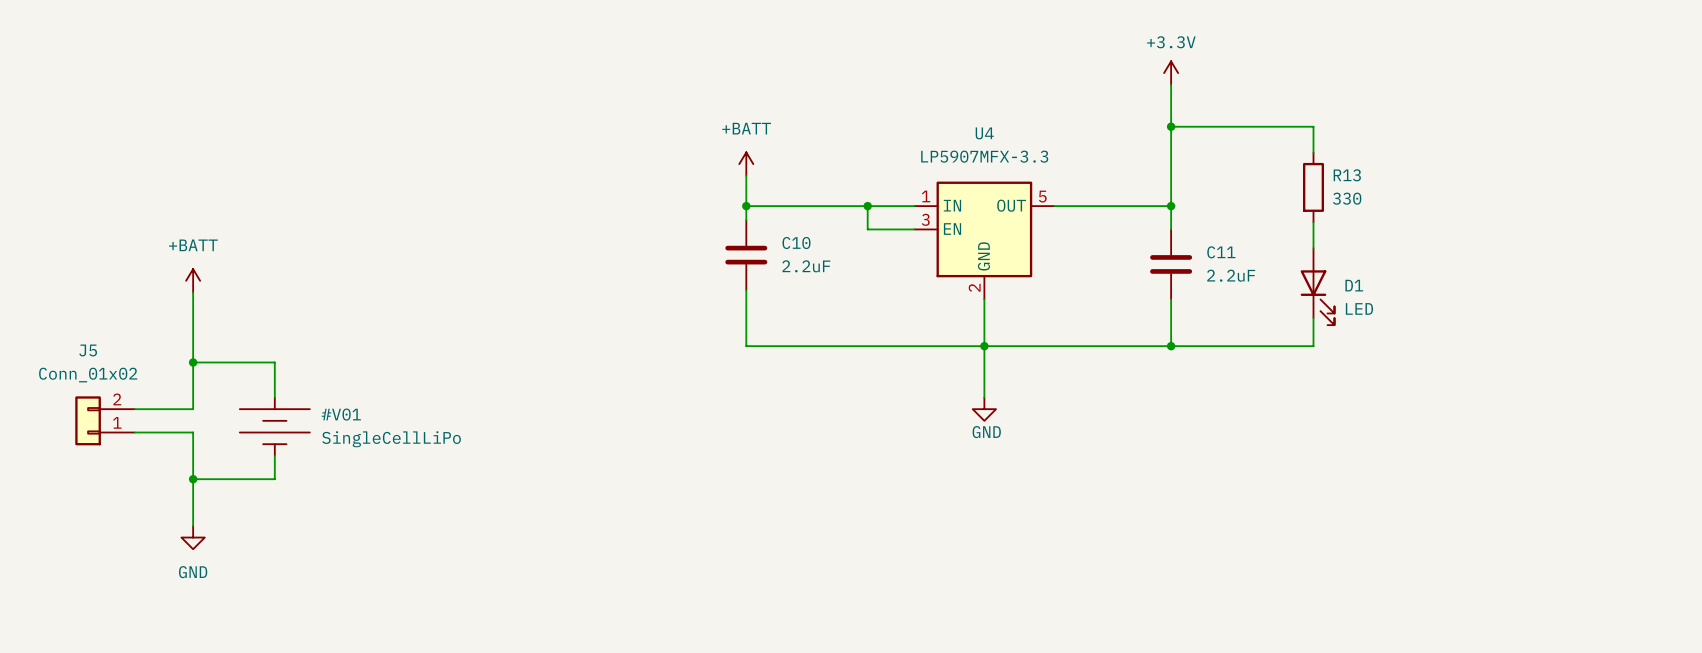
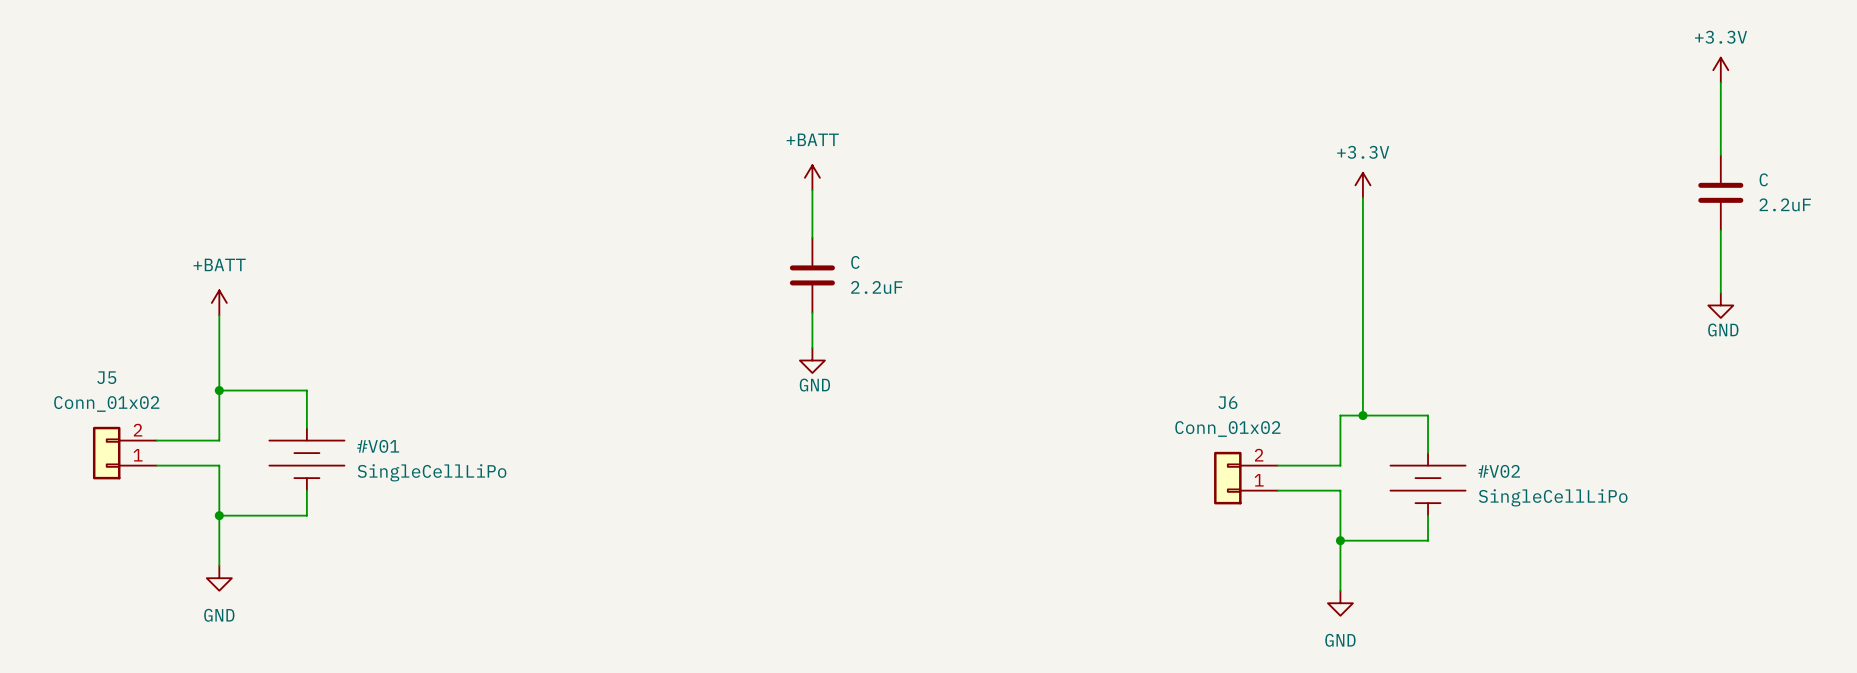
power symbol: none -> +3.3V (1720, 70)
power symbol position: +3.3V (1171, 73) -> +3.3V (1362, 185)
wire: none -> (1720, 82) (1720, 155)
wire: (1171, 84) (1171, 229) -> none
wire: (1171, 126) (1313, 126) (1313, 152) -> none
junction: (1171, 126) -> none
C: none -> 2.2uF (1720, 192)
wire: none -> (1362, 197) (1362, 415)
R13: 330 (1313, 187) -> none
wire: (746, 206) (914, 206) -> none
junction: (746, 206) -> none
wire: (867, 206) (867, 229) (914, 229) -> none
junction: (867, 206) -> none
wire: (1054, 206) (1171, 206) -> none
junction: (1171, 206) -> none
wire: none -> (1720, 230) (1720, 292)
wire: (1313, 222) (1313, 248) -> none
U4: LP5907MFX-3.3 (984, 240) -> none
C10 name: C10 (796, 243) -> C (855, 262)
C11: 2.2uF (1171, 264) -> none
power symbol: none -> GND (1720, 305)
D1: LED (1317, 286) -> none
wire: (984, 299) (984, 397) -> none
wire: (1171, 299) (1171, 346) -> none
wire: (1313, 318) (1313, 346) (746, 346) (746, 322) -> none
power symbol: none -> GND (812, 360)
junction: (984, 346) -> none
junction: (1171, 346) -> none
junction: none -> (1362, 415)
power symbol: GND (984, 409) -> none
wire: none -> (1428, 453) (1428, 415) (1340, 415) (1340, 465) (1277, 465)
J6: none -> Conn_01x02 (1245, 478)
#V02: none -> SingleCellLiPo (1428, 484)
wire: none -> (1277, 490) (1340, 490) (1340, 590)
wire: none -> (1428, 515) (1428, 540) (1340, 540)
junction: none -> (1340, 540)
power symbol: none -> GND (1340, 603)

